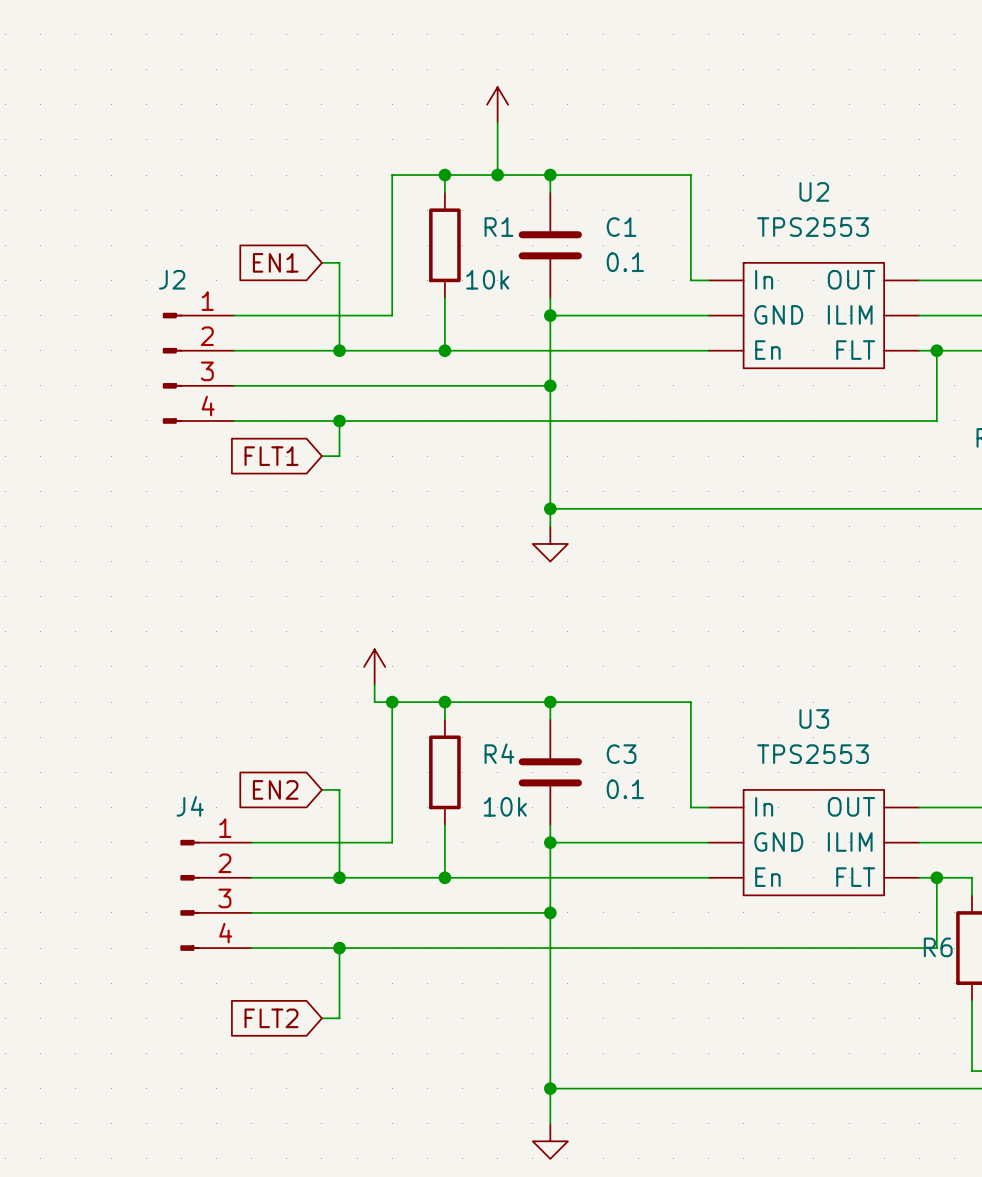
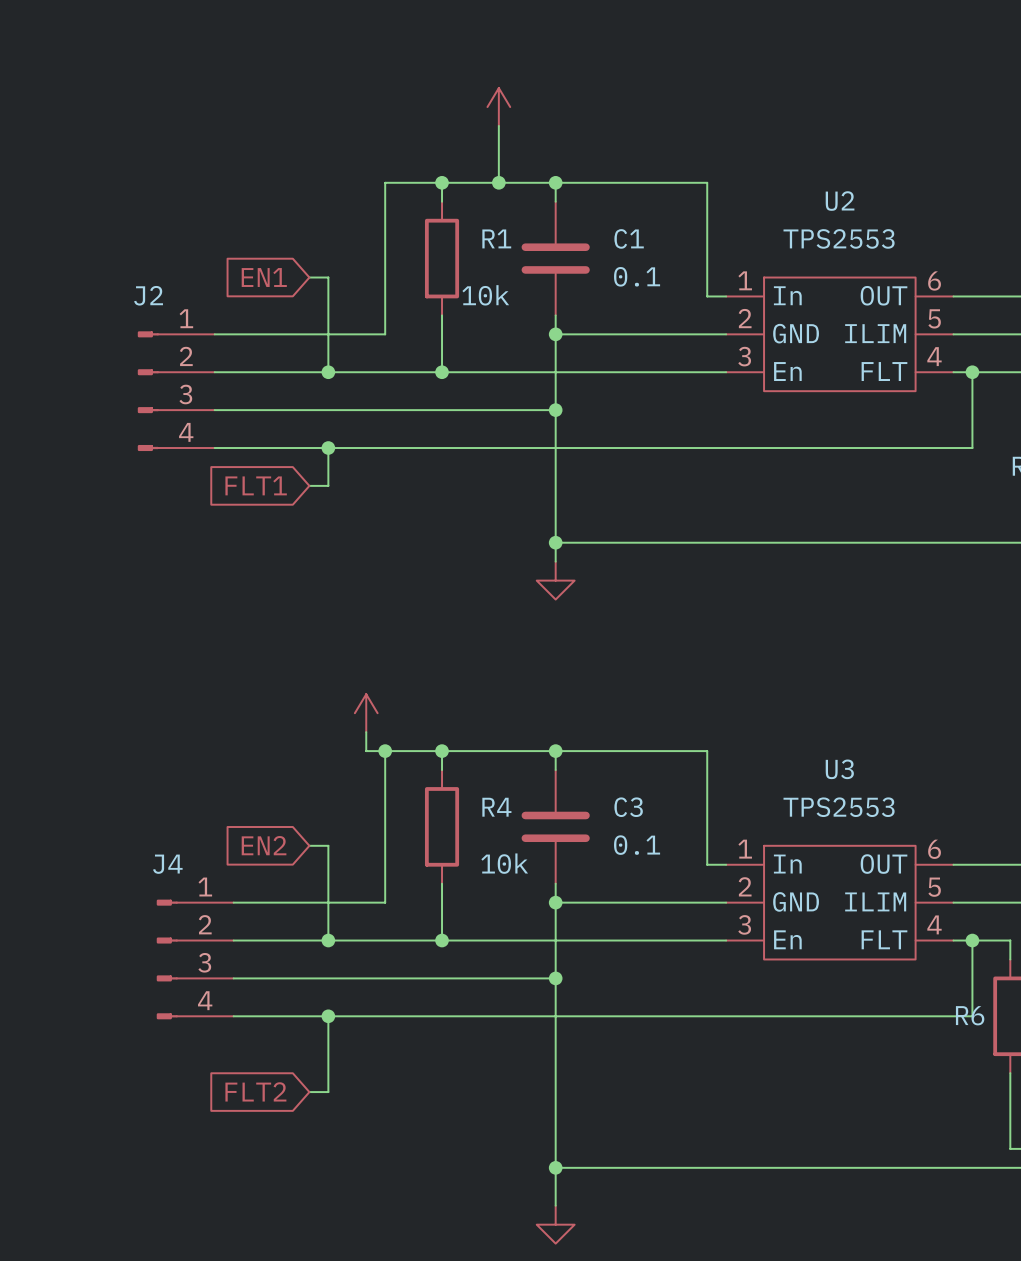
U2 pin number: none -> 1 (745, 280)
U2 pin number: none -> 6 (934, 281)
U2 pin number: none -> 2 (745, 318)
U2 pin number: none -> 5 (934, 318)
U2 pin number: none -> 4 (934, 356)
U2 pin number: none -> 3 (744, 356)
U3 pin number: none -> 1 (745, 849)
U3 pin number: none -> 6 (934, 849)
U3 pin number: none -> 2 (745, 886)
U3 pin number: none -> 5 (934, 887)
U3 pin number: none -> 4 (934, 924)
U3 pin number: none -> 3 (744, 924)

